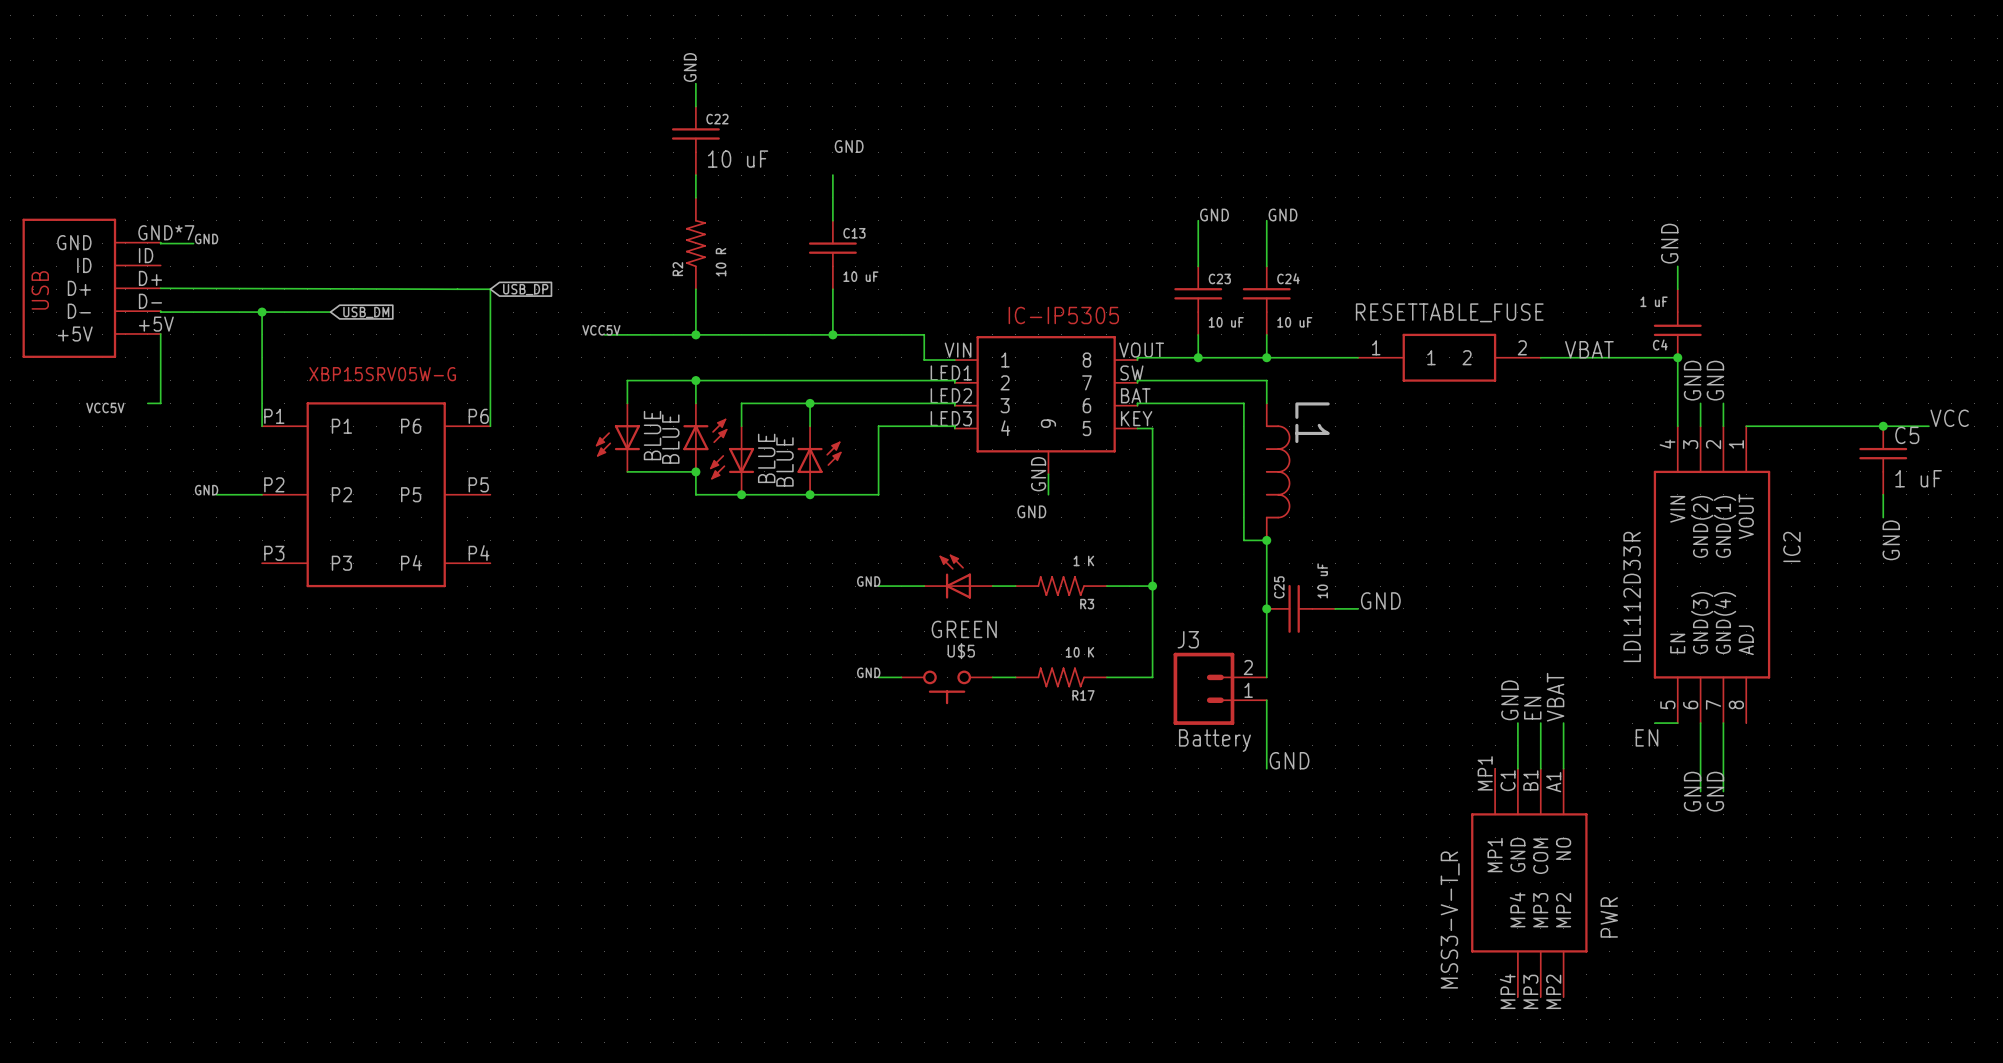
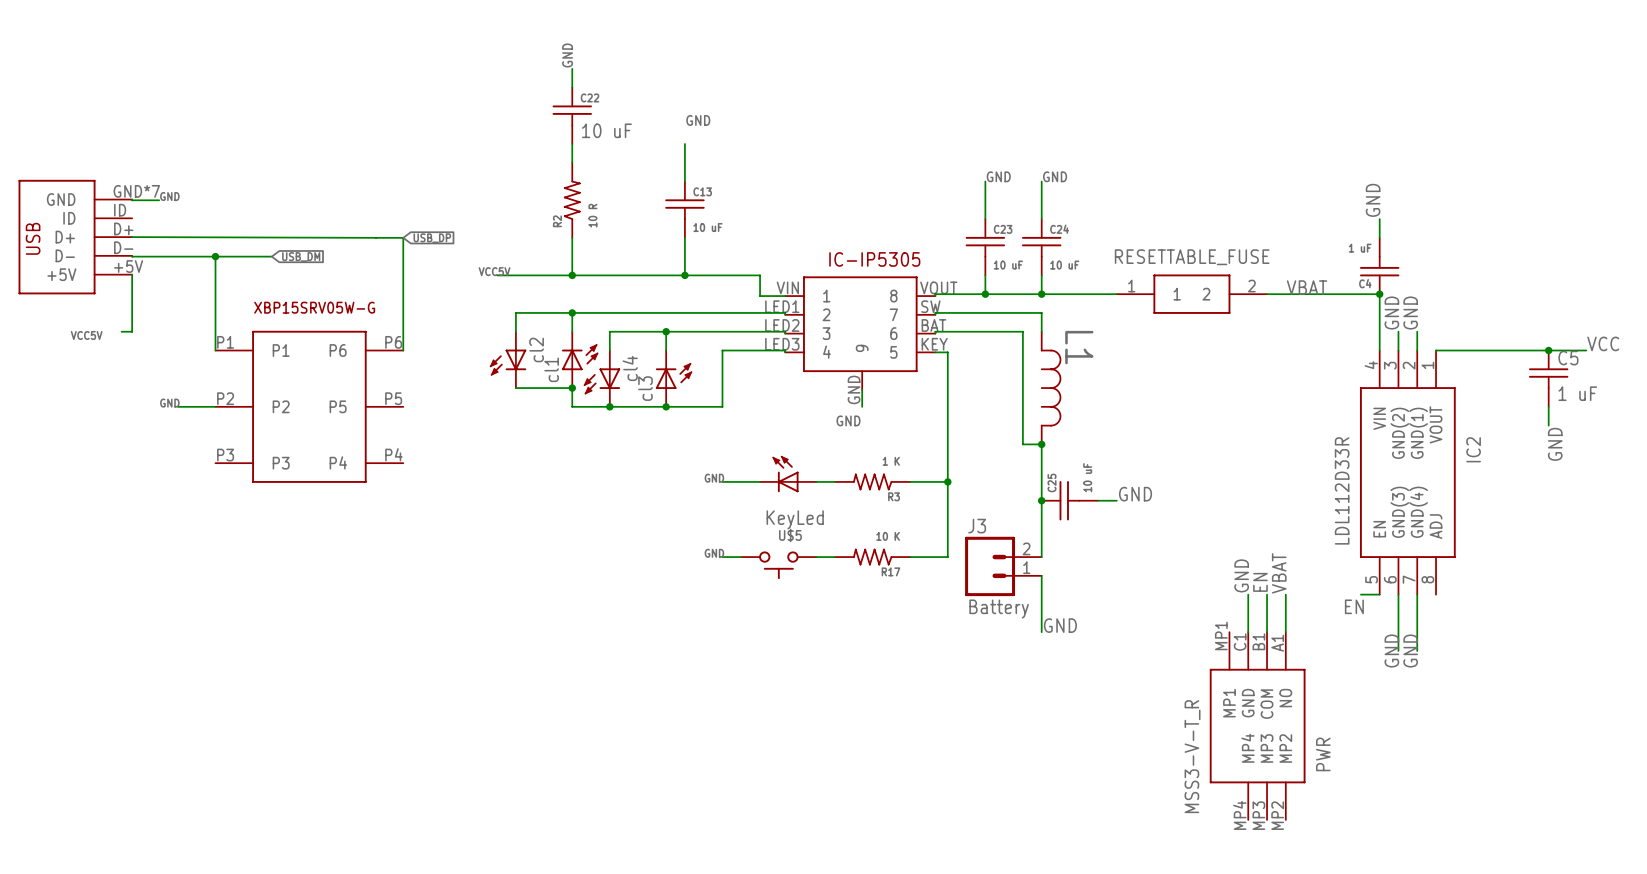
part value: BLUE (652, 435) -> cl2 (536, 349)
part value: BLUE (670, 439) -> cl1 (551, 369)
part value: BLUE (766, 458) -> cl4 (630, 368)
part value: BLUE (784, 461) -> cl3 (645, 388)
part value: GREEN (964, 629) -> KeyLed (795, 519)

